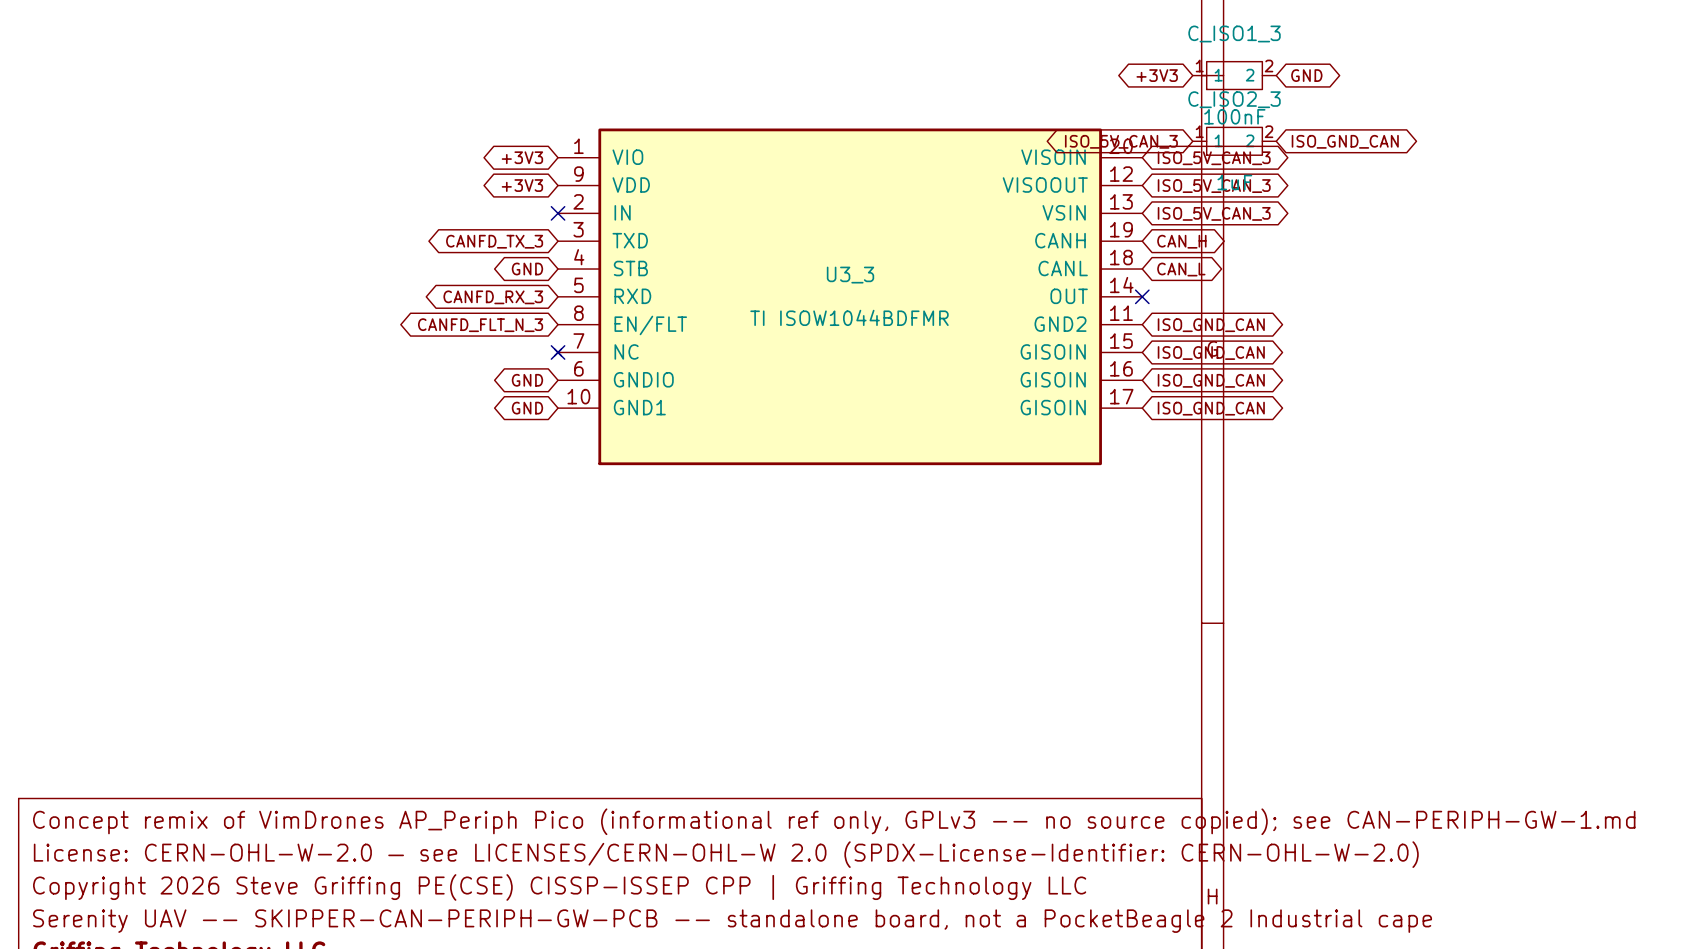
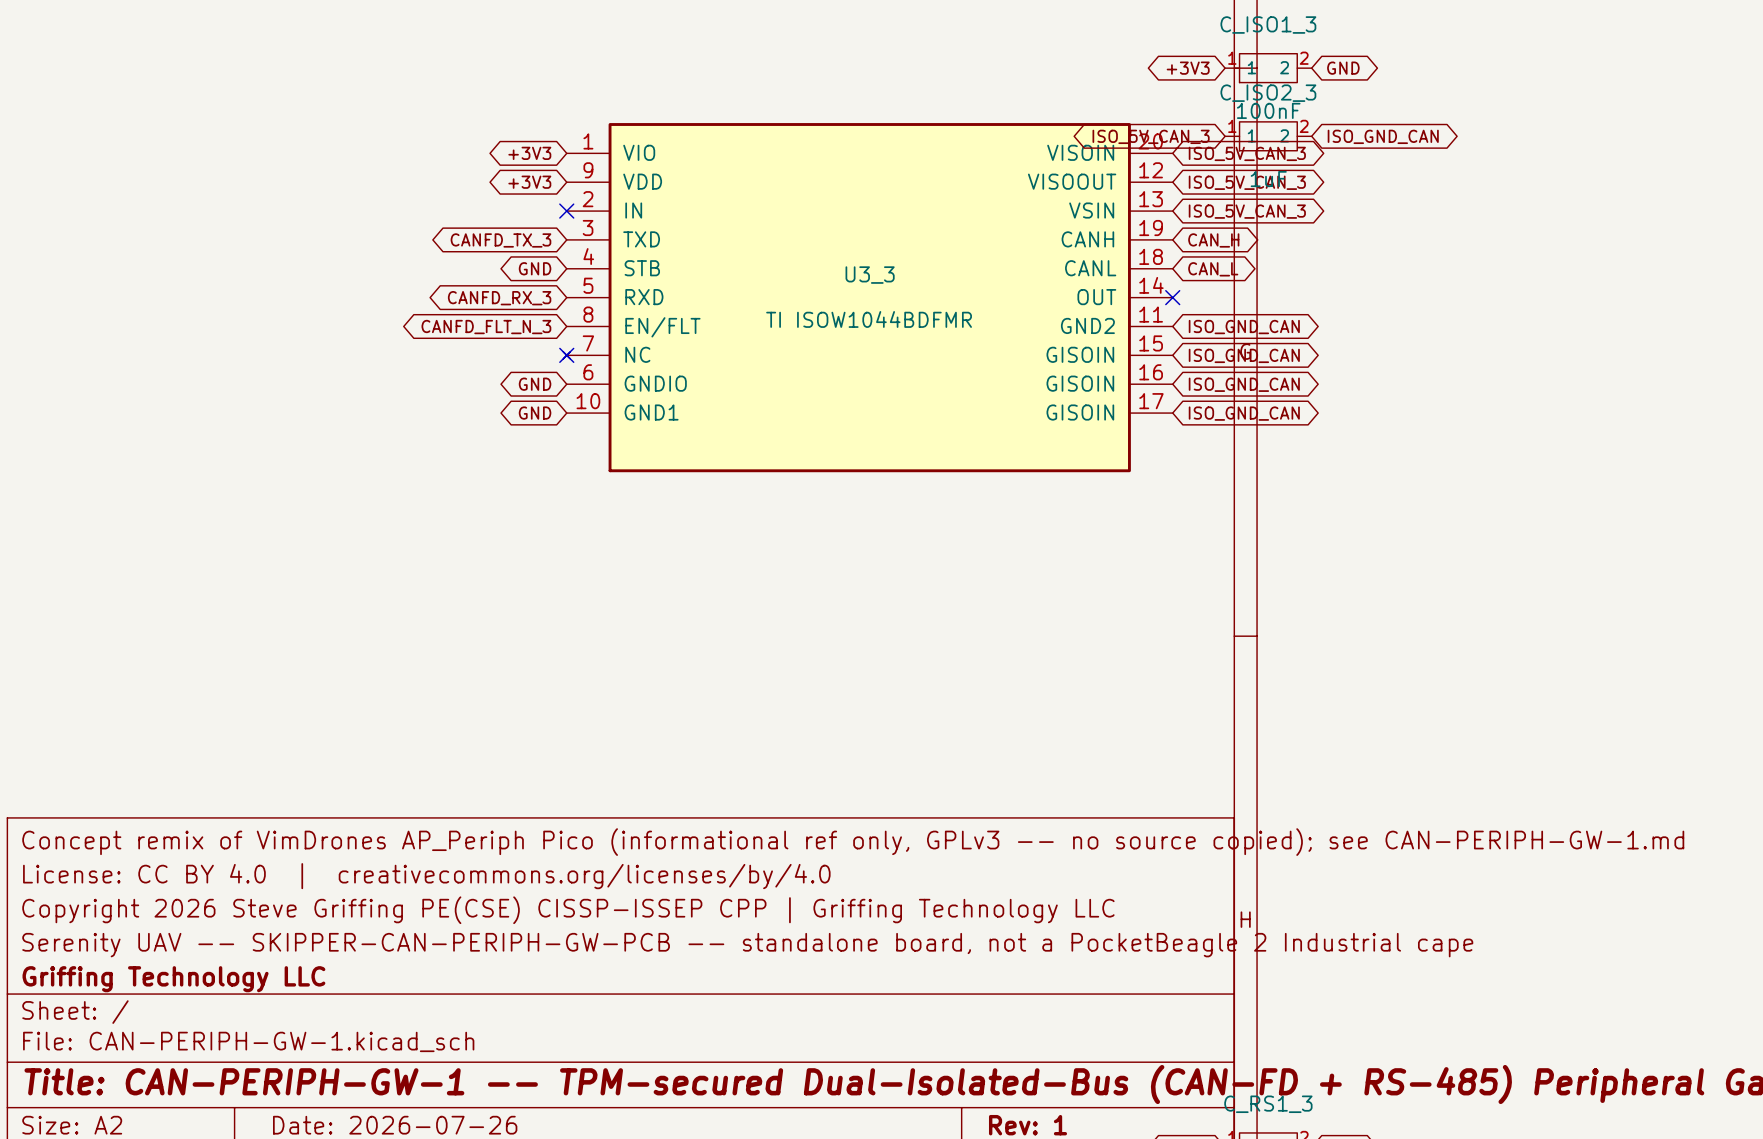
title block: License: CERN-OHL-W-2.0 — see LICENSES/CERN-OHL-W 2.0 (SPDX-License-Identifier: CERN-OHL-W-2.0) (726, 854) -> License: CC BY 4.0 | creativecommons.org/licenses/by/4.0 (426, 876)

